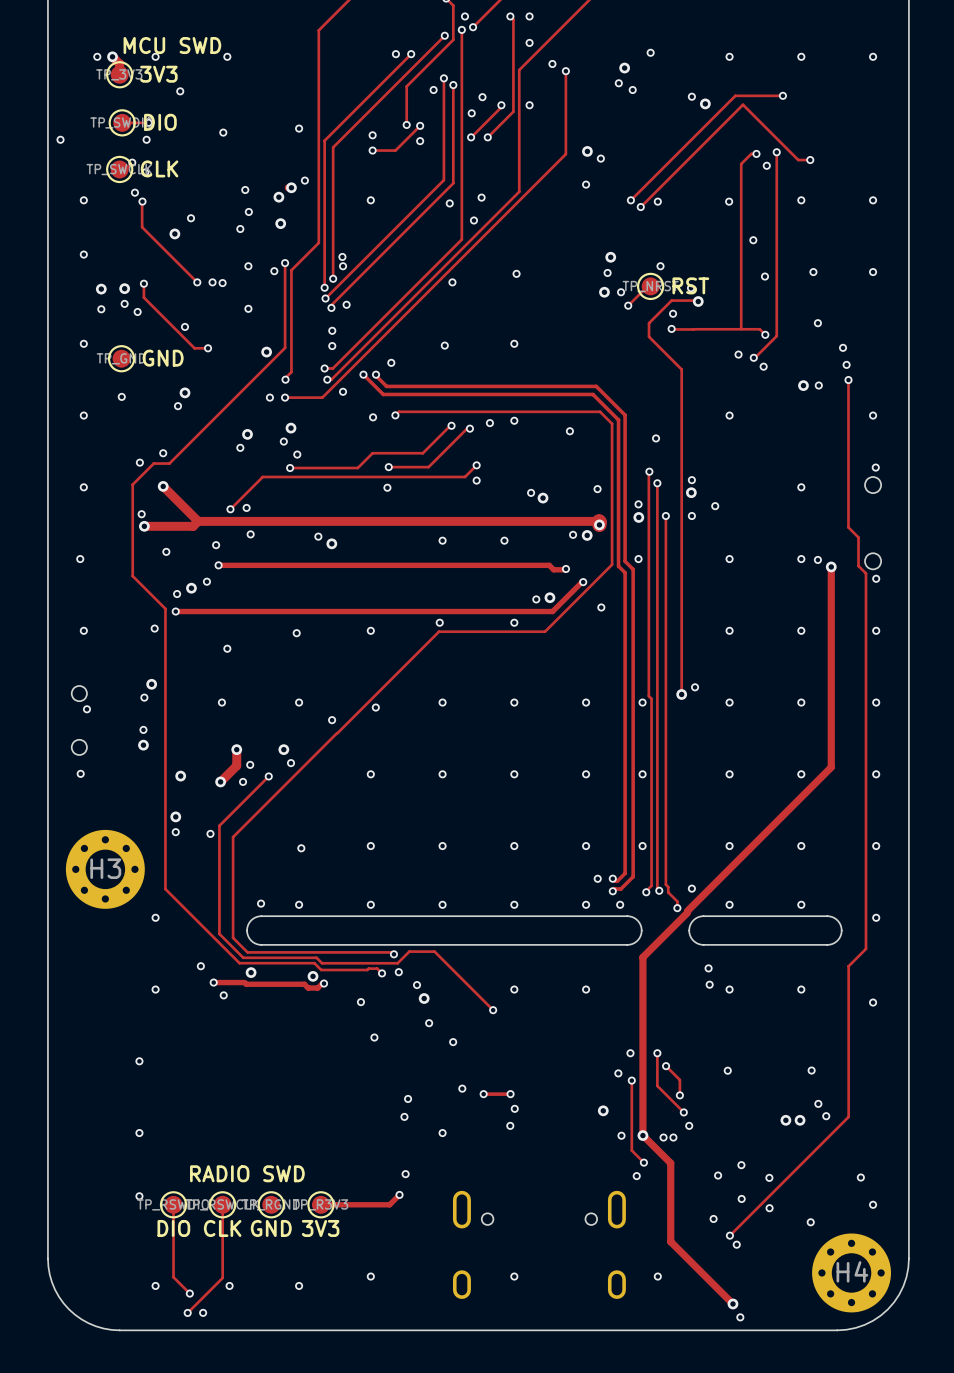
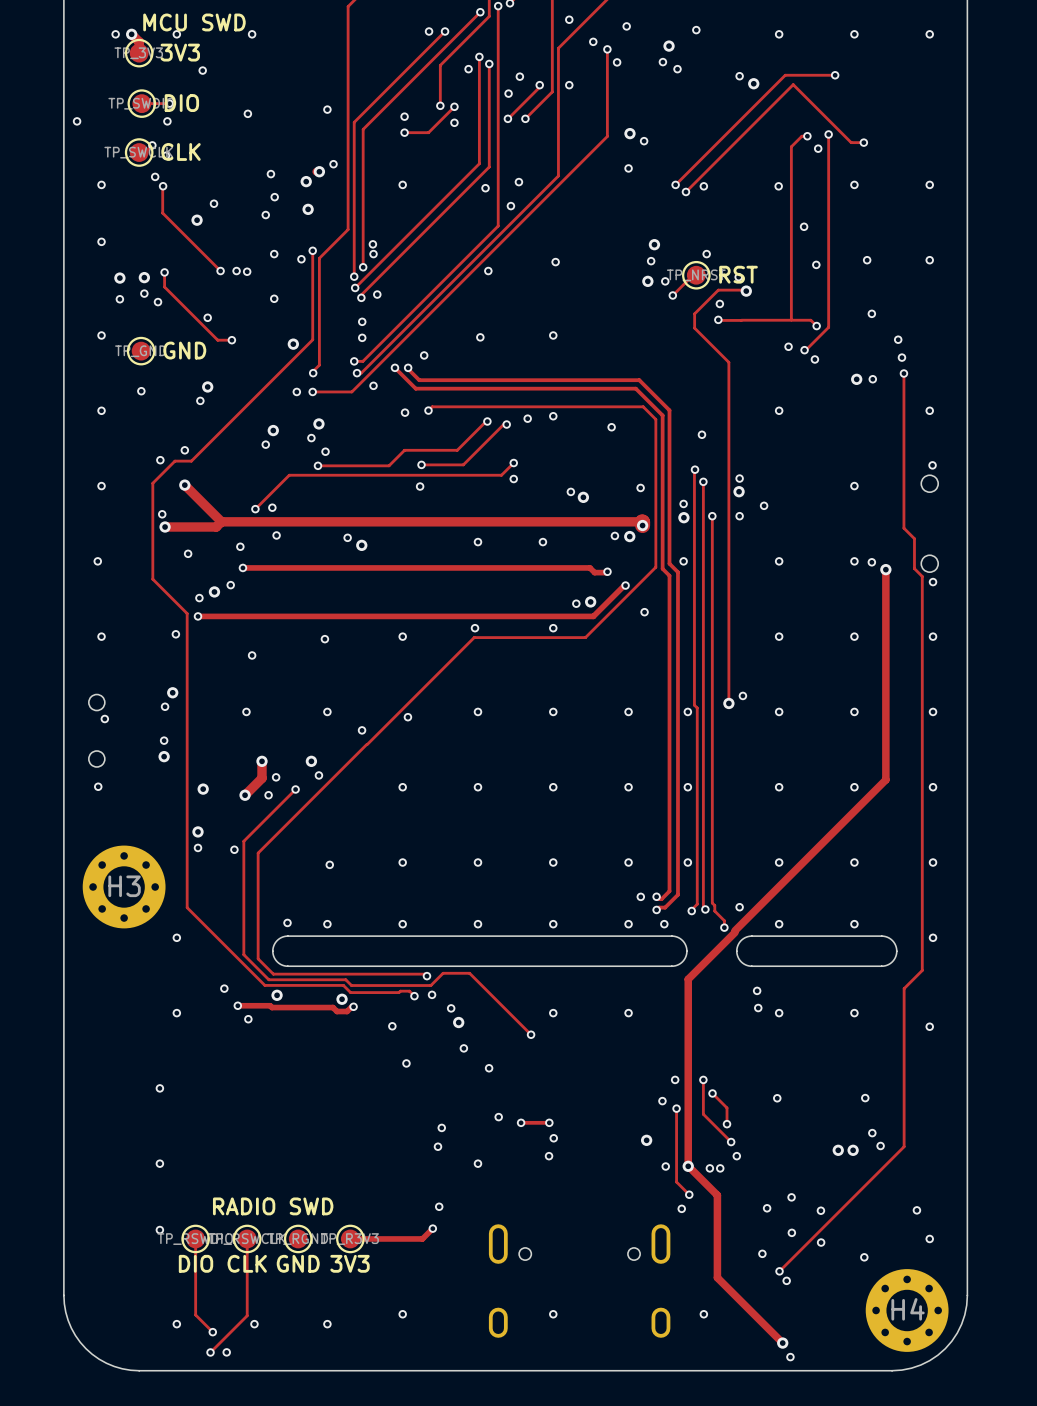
via: none -> (626, 26)
via: none -> (617, 62)

